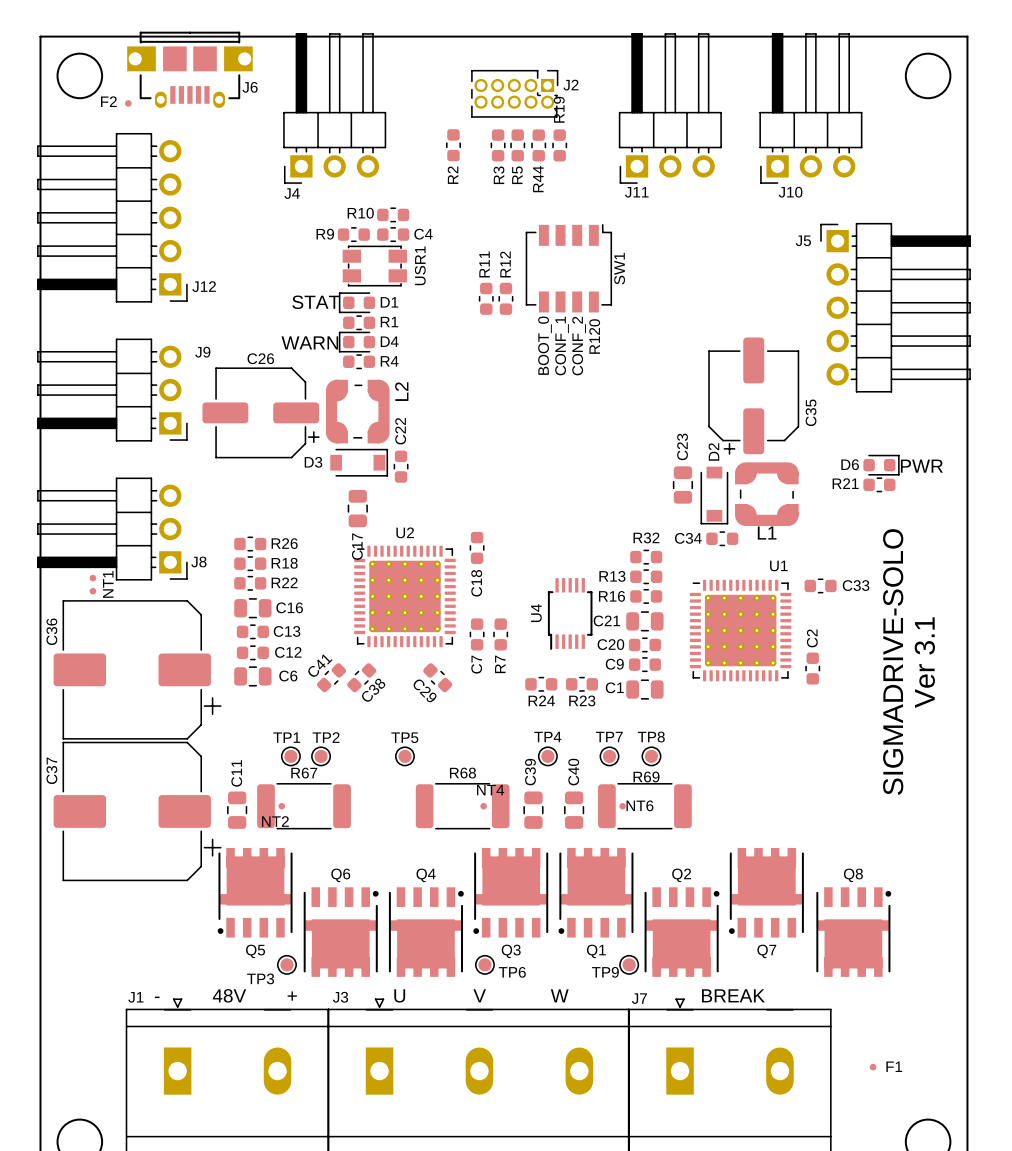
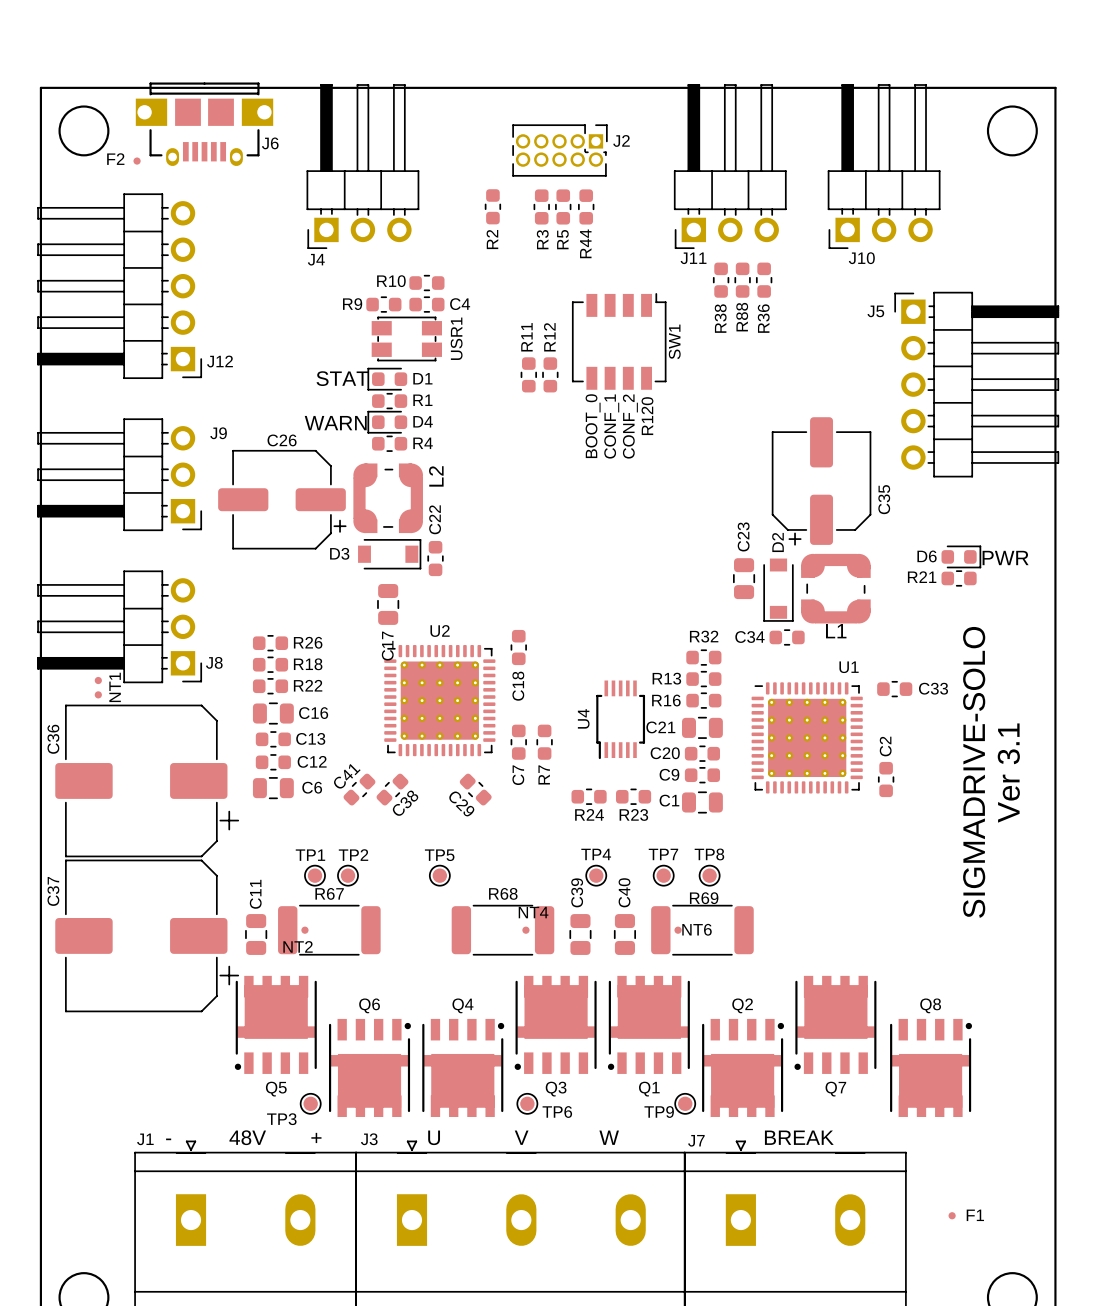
R19: (559, 145) -> none
R38: none -> (721, 280)
R88: none -> (742, 280)
R36: none -> (764, 280)

